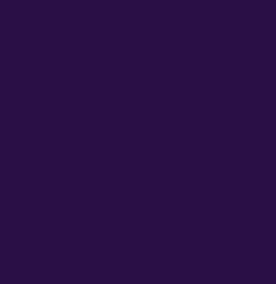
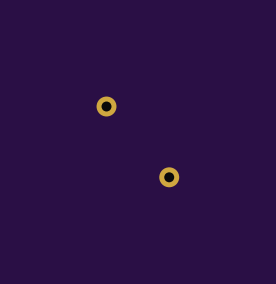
via: none -> (106, 106)
via: none -> (169, 177)

